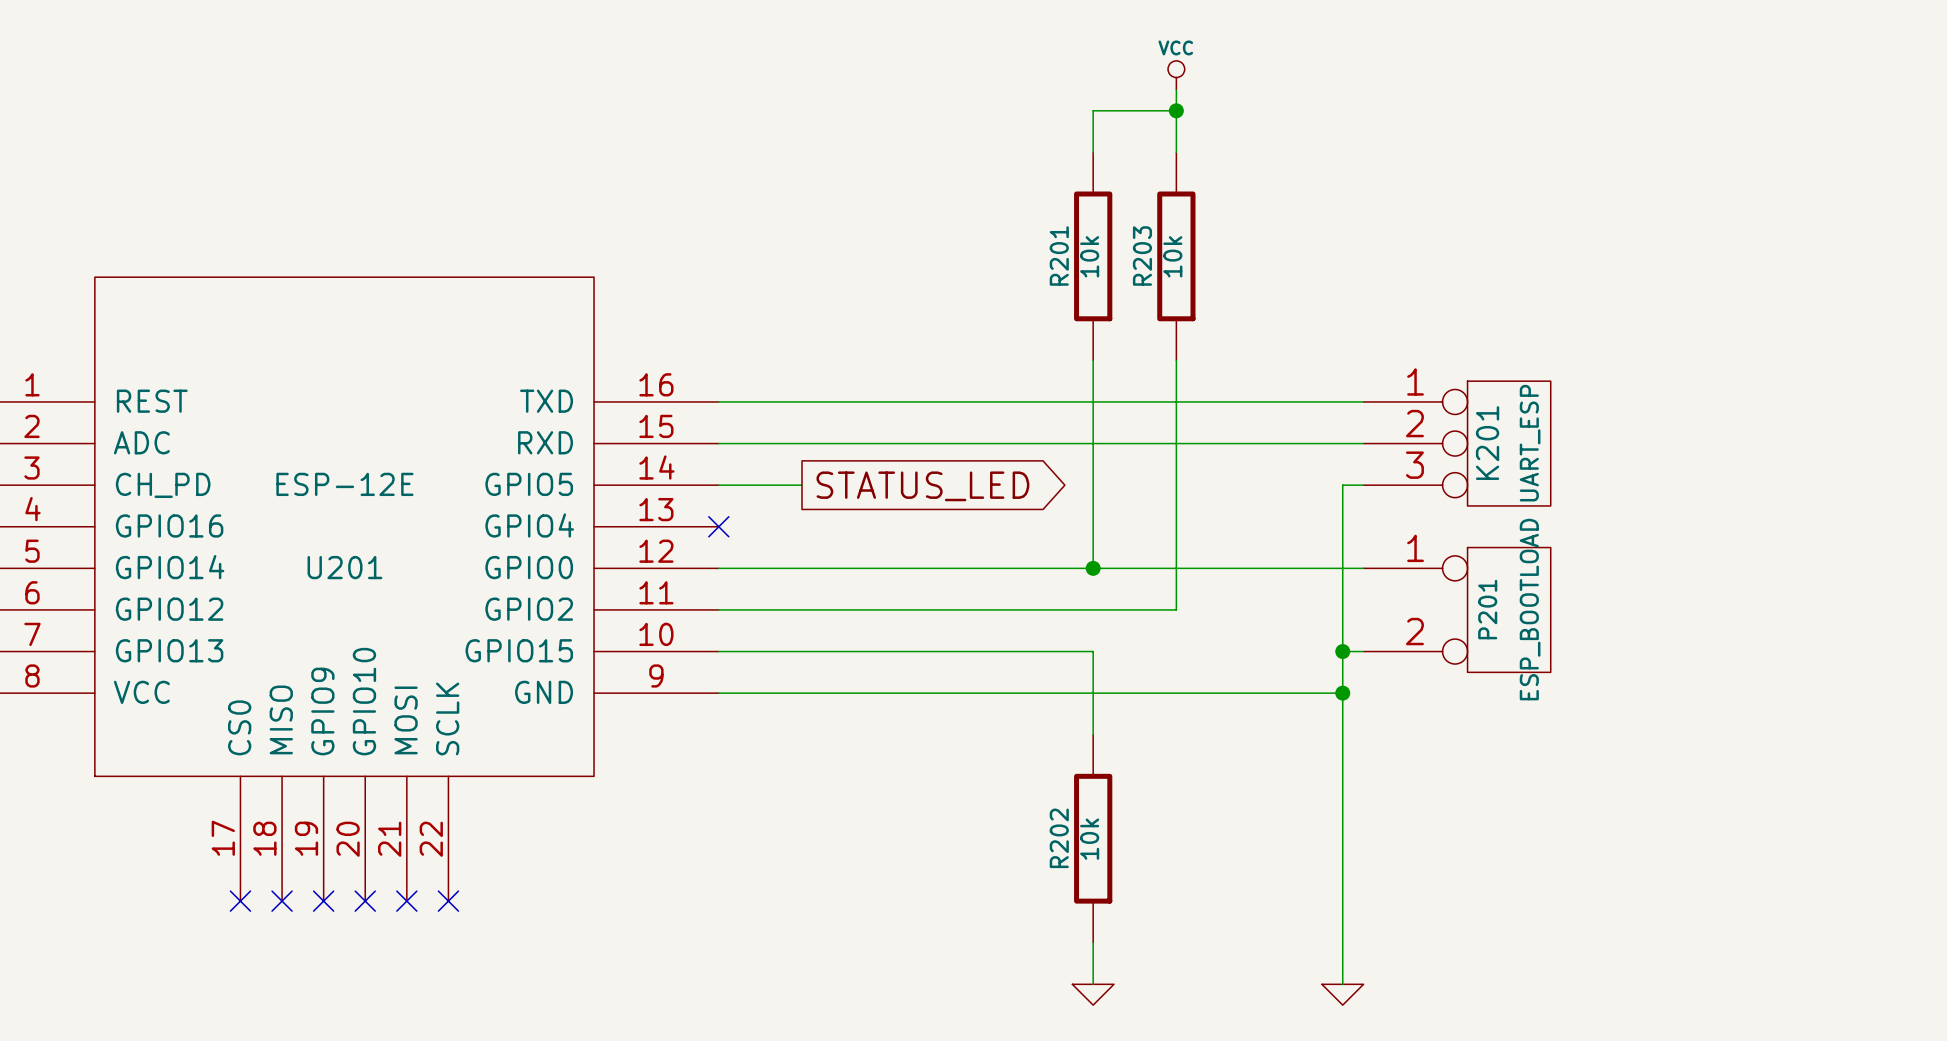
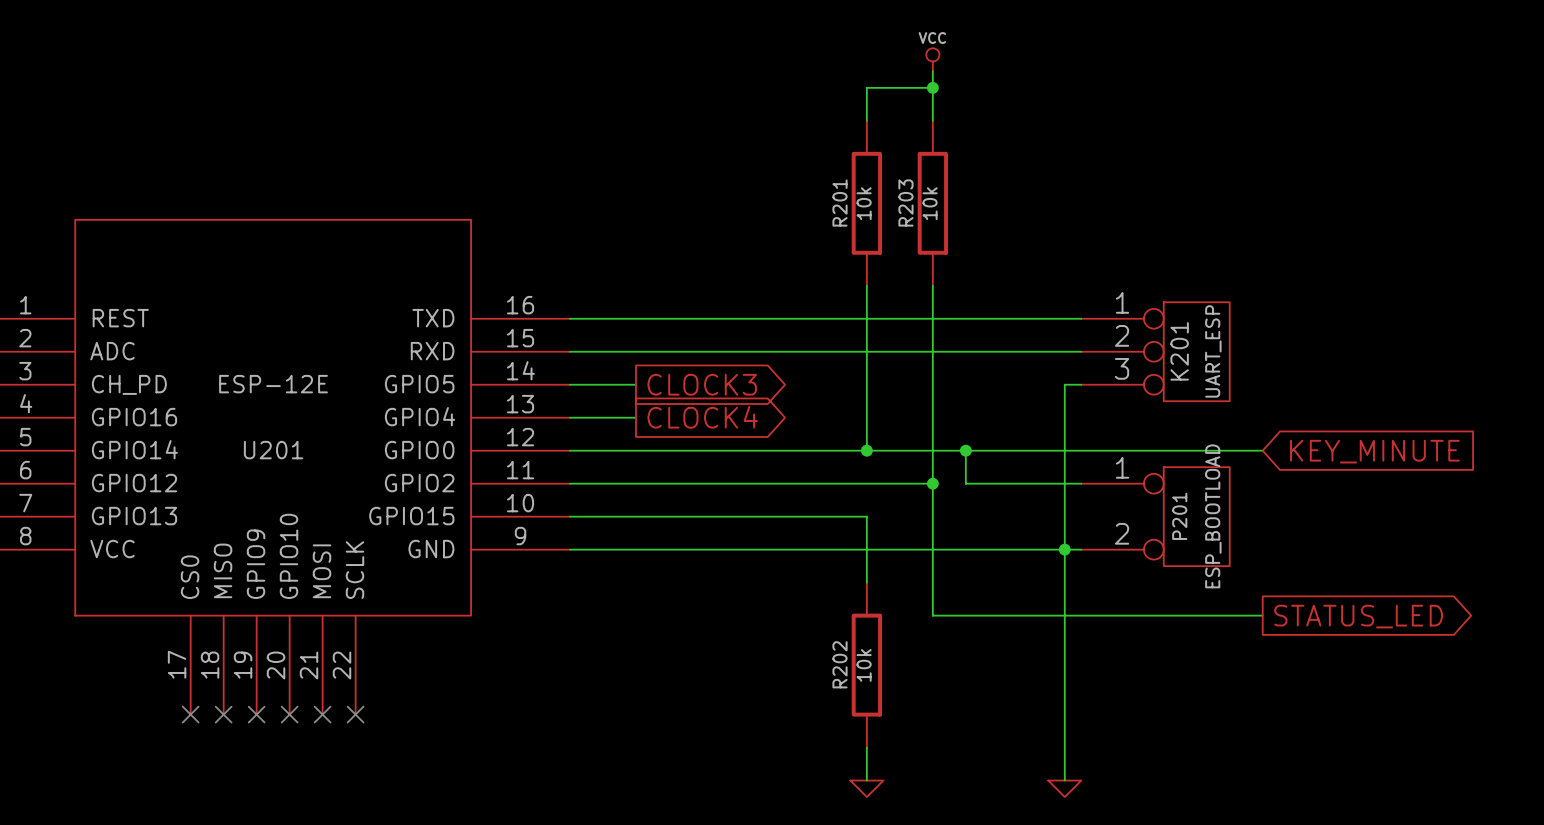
global label: STATUS_LED (922, 486) -> CLOCK3 (702, 384)
wire: none -> (570, 417) (635, 417)
no-connect mark: (718, 526) -> none
global label: none -> CLOCK4 (702, 417)
wire: none -> (965, 450) (965, 483) (1081, 483)
junction: none -> (965, 450)
wire: none -> (1081, 450) (1262, 450)
global label: none -> KEY_MINUTE (1374, 451)
wire: none -> (932, 483) (932, 615) (1262, 615)
junction: none -> (932, 483)
P201 position: (1457, 609) -> (1155, 516)
wire: (1342, 651) (1363, 651) -> (1064, 549) (1081, 549)
junction: (1342, 651) -> none
global label: none -> STATUS_LED (1358, 616)

